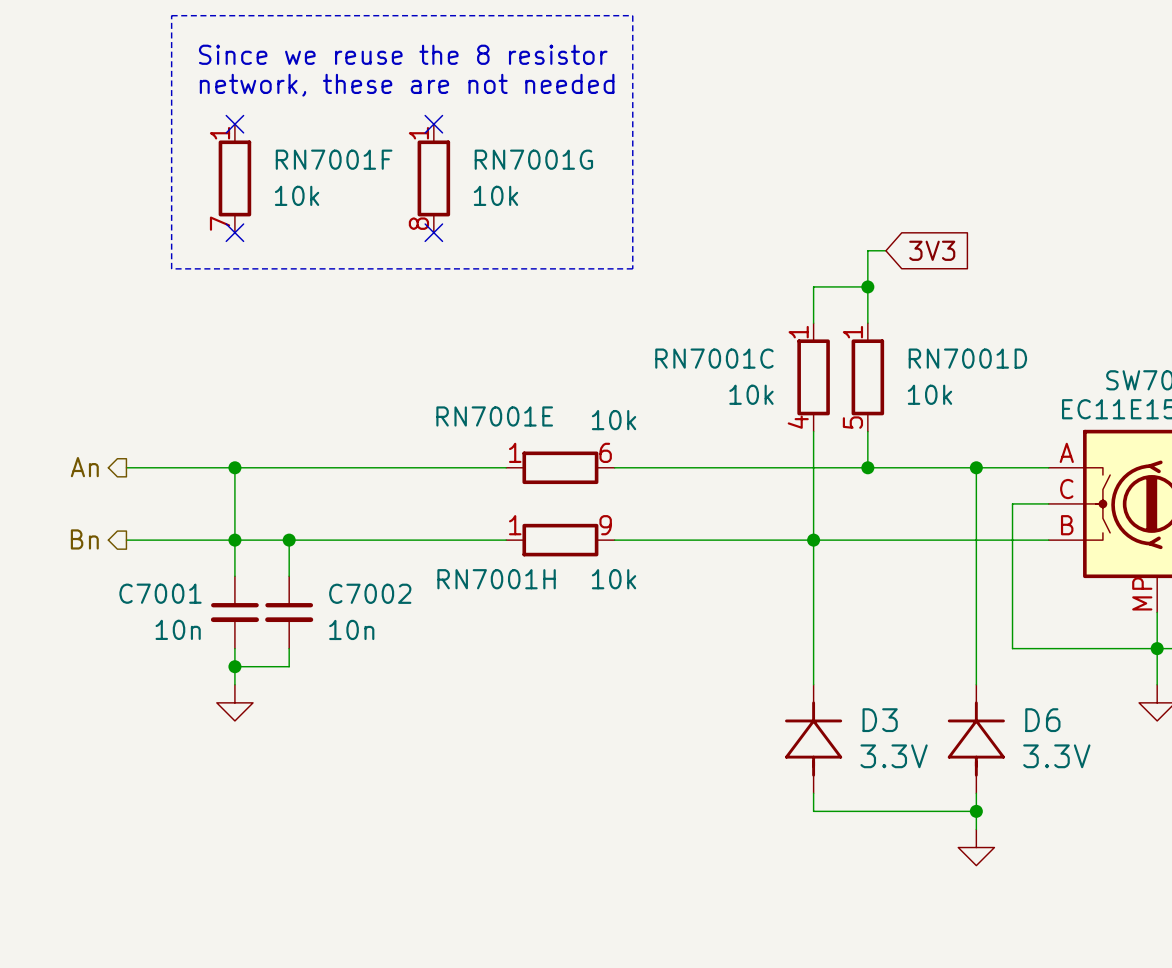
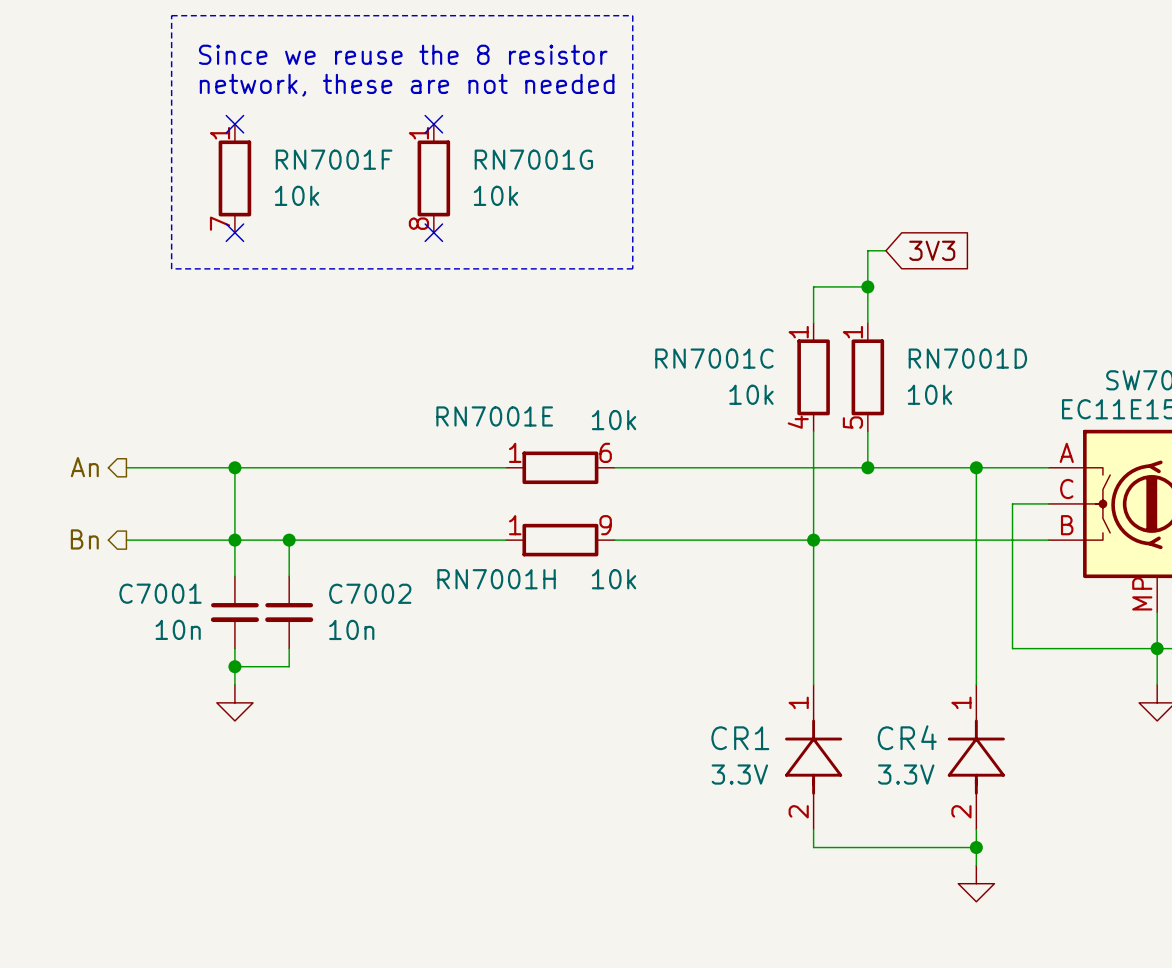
D3: 3.3V (813, 739) -> none
D6: 3.3V (976, 739) -> none
CR1: none -> (813, 757)
CR4: none -> (976, 757)
wire: (813, 793) (813, 811) (976, 811) -> (813, 829) (813, 847) (976, 847)
junction position: (976, 811) -> (976, 847)
power symbol position: (976, 847) -> (976, 883)

